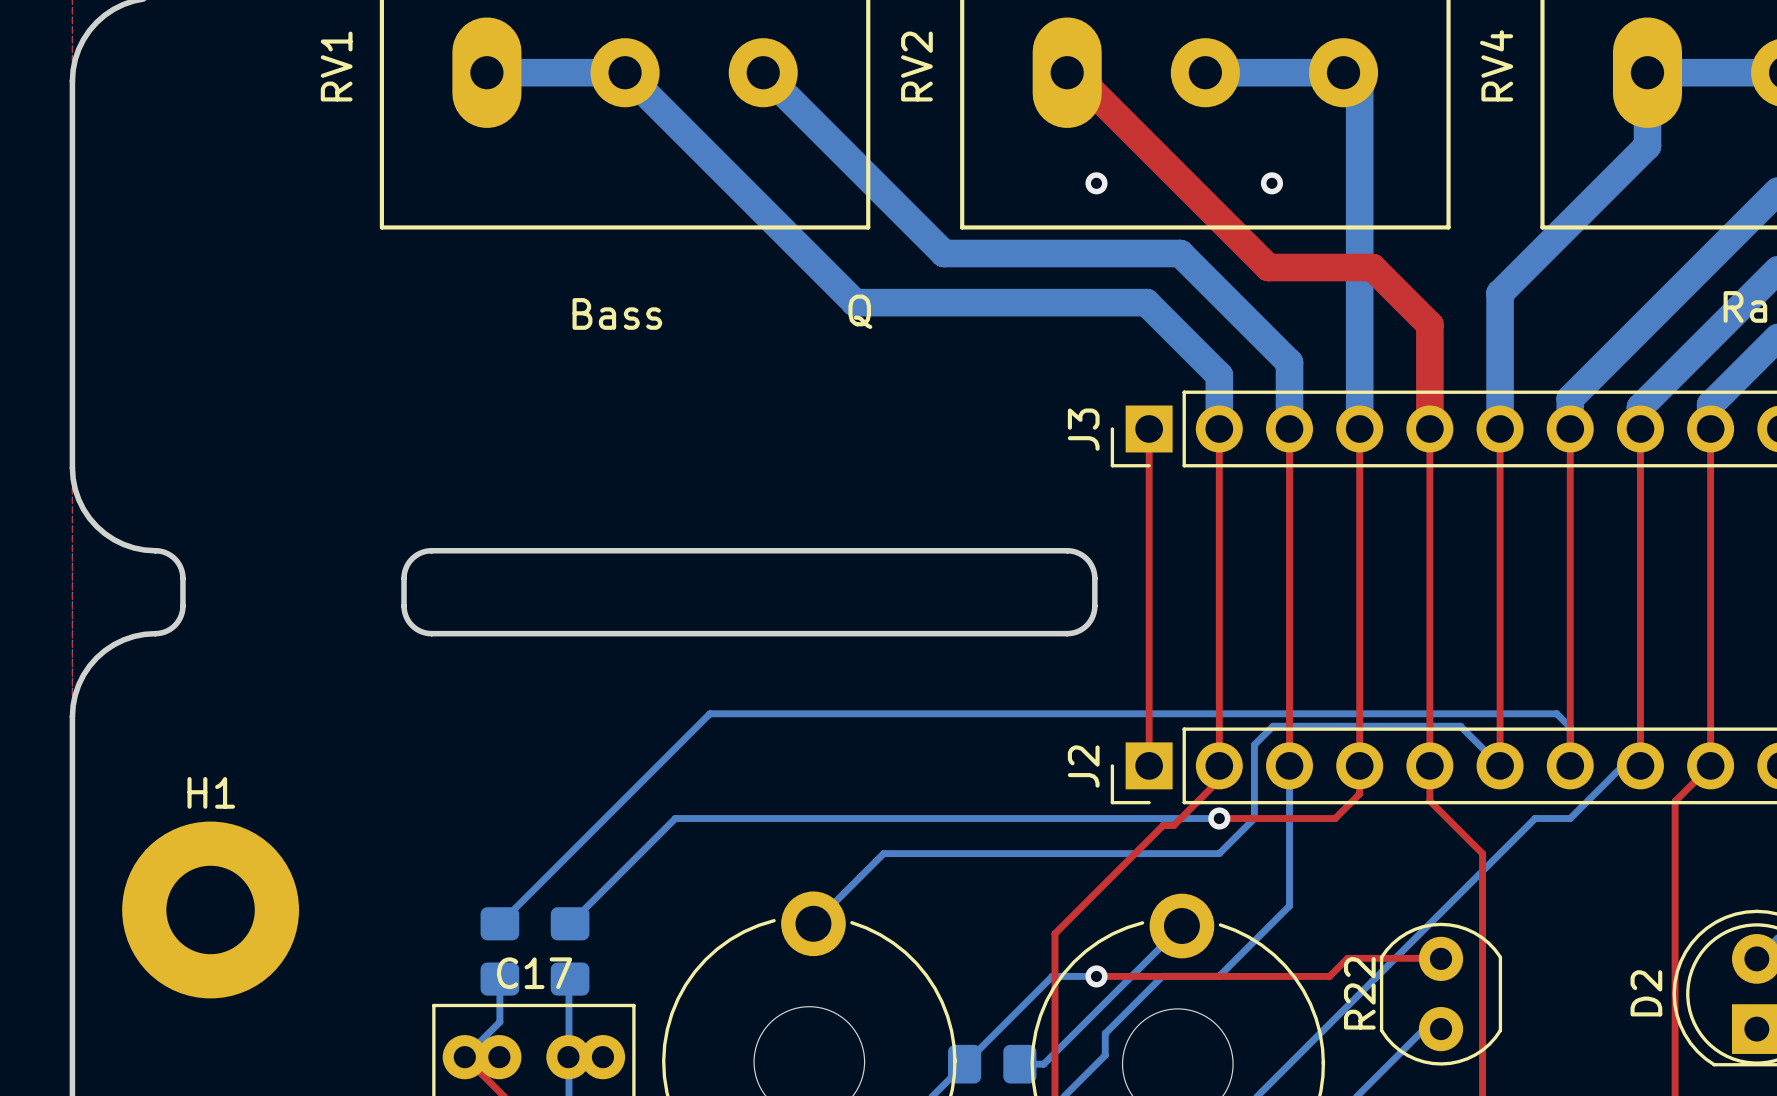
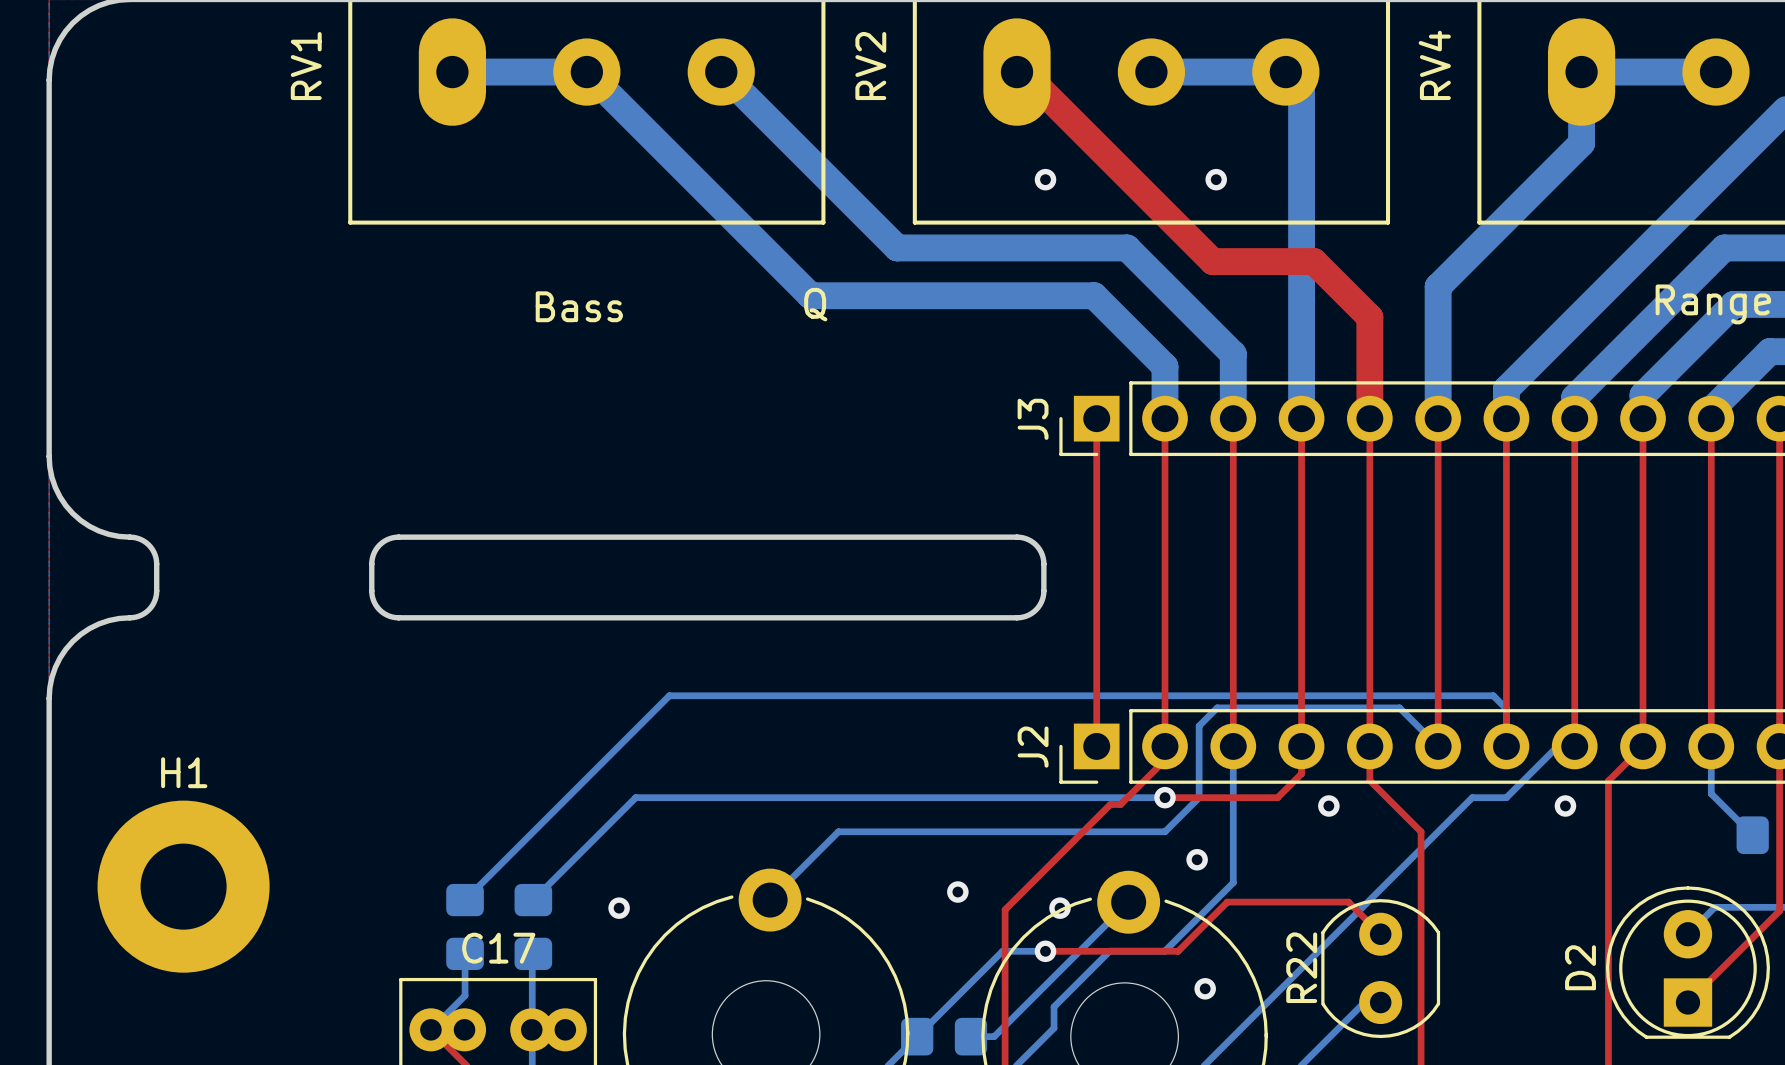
via: none -> (1328, 805)
via: none -> (1565, 805)
via: none -> (1197, 859)
via: none -> (957, 892)
via: none -> (619, 908)
via: none -> (1060, 908)
top track: (1440, 958) (1347, 958) (1329, 976) (1232, 976) -> (1380, 933) (1348, 902) (1227, 902) (1178, 951)
via: none -> (1205, 988)

